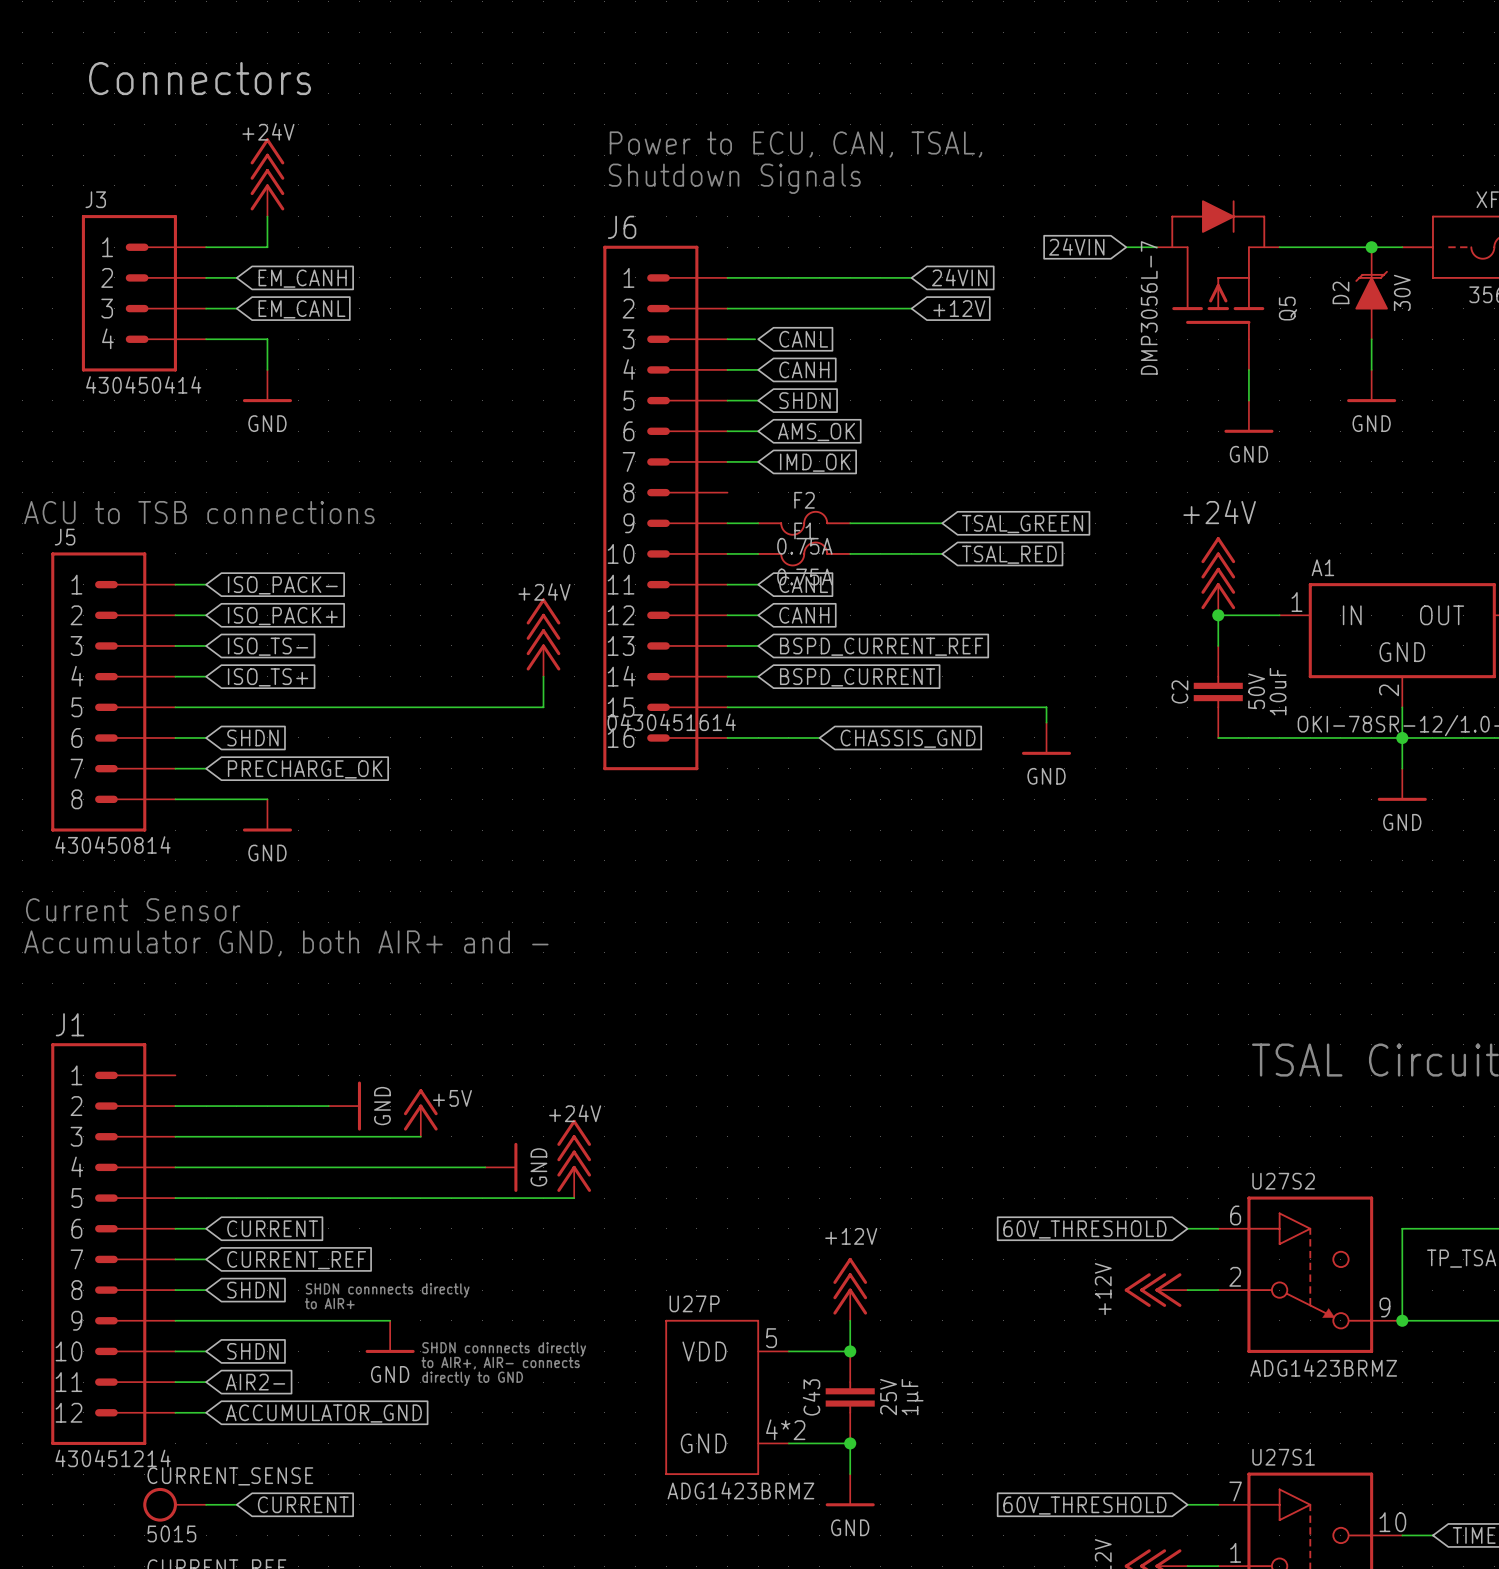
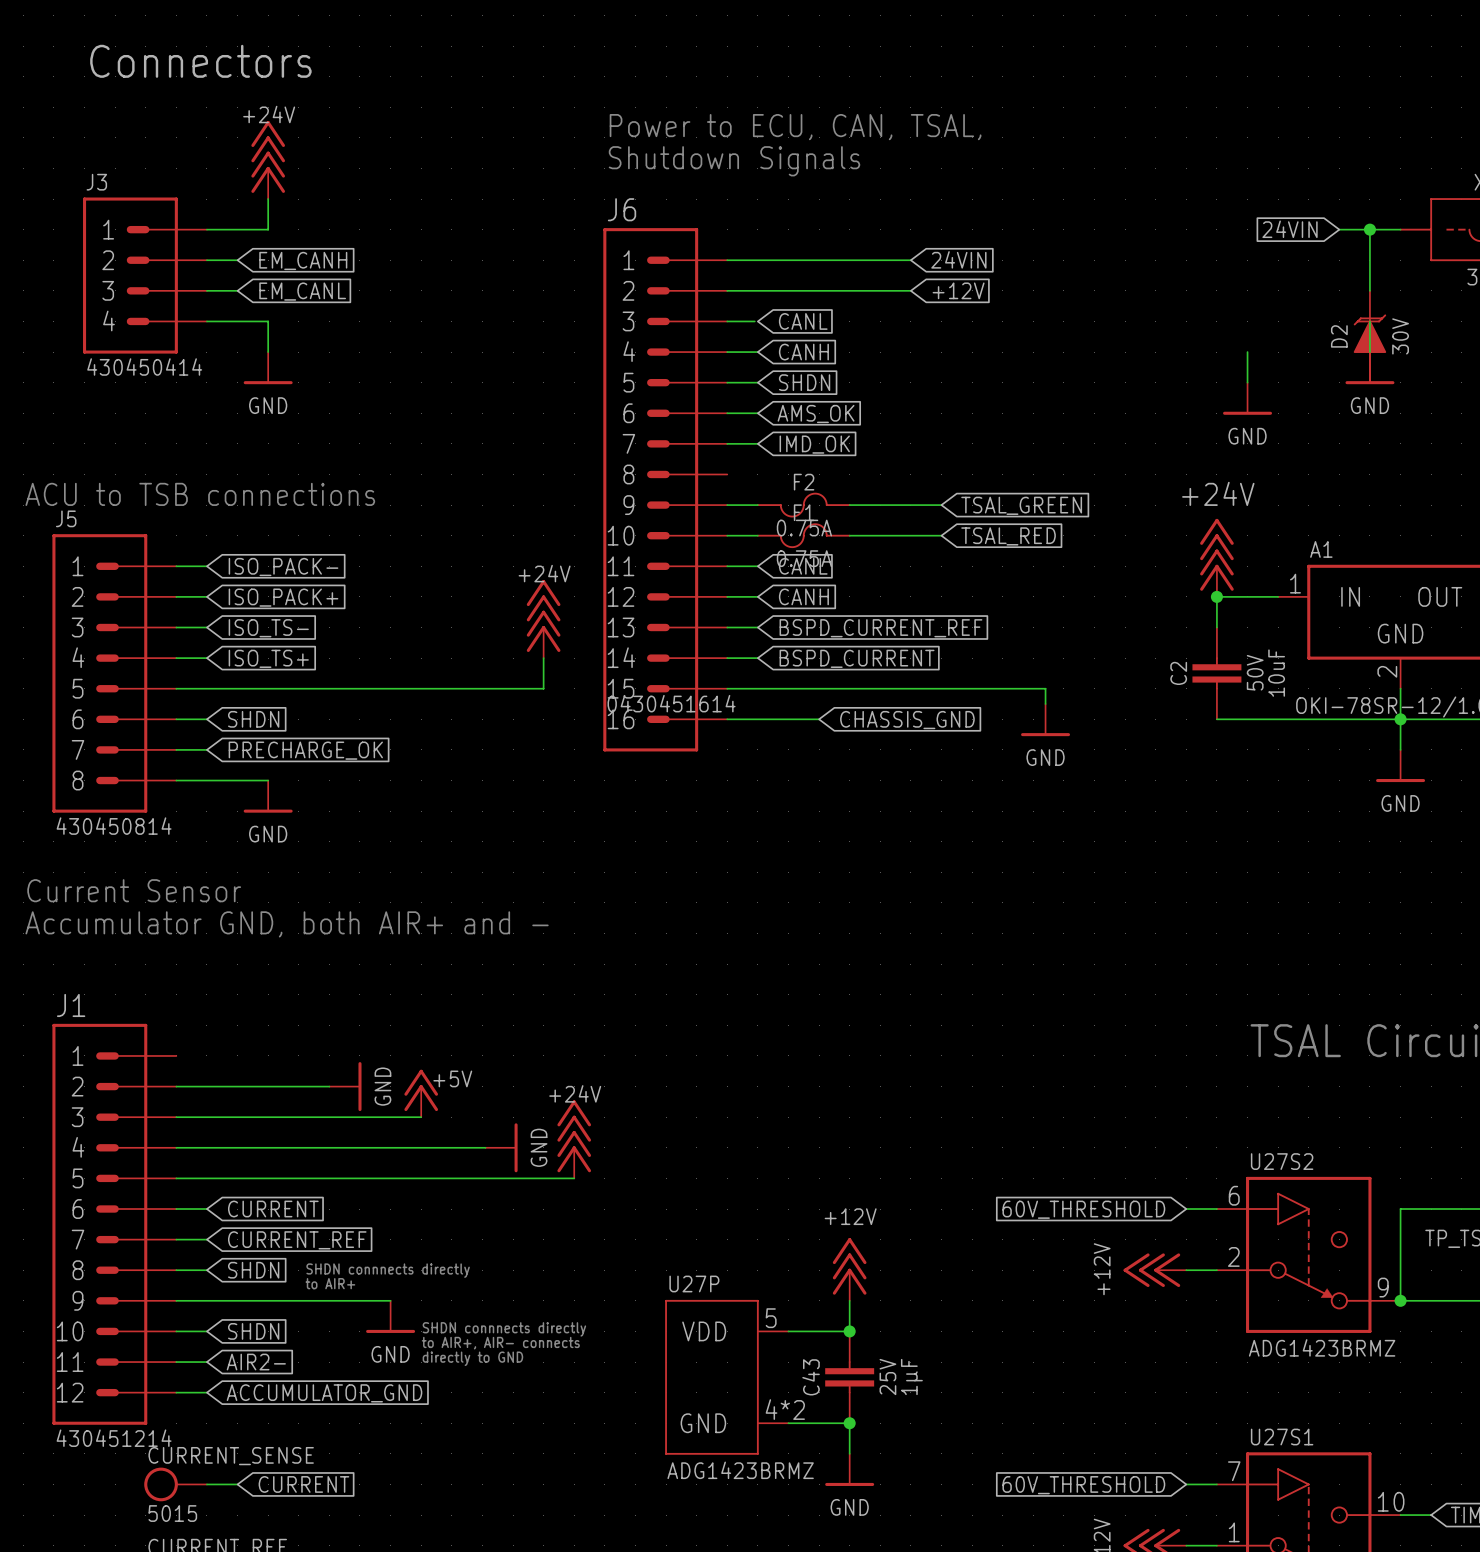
global label position: 24VIN (1076, 246) -> 24VIN (1290, 229)
wire: (1126, 247) (1156, 247) -> none
wire: (1279, 247) (1340, 247) -> none
Q5: (1218, 285) -> none
D2 position: (1371, 293) -> (1369, 336)

